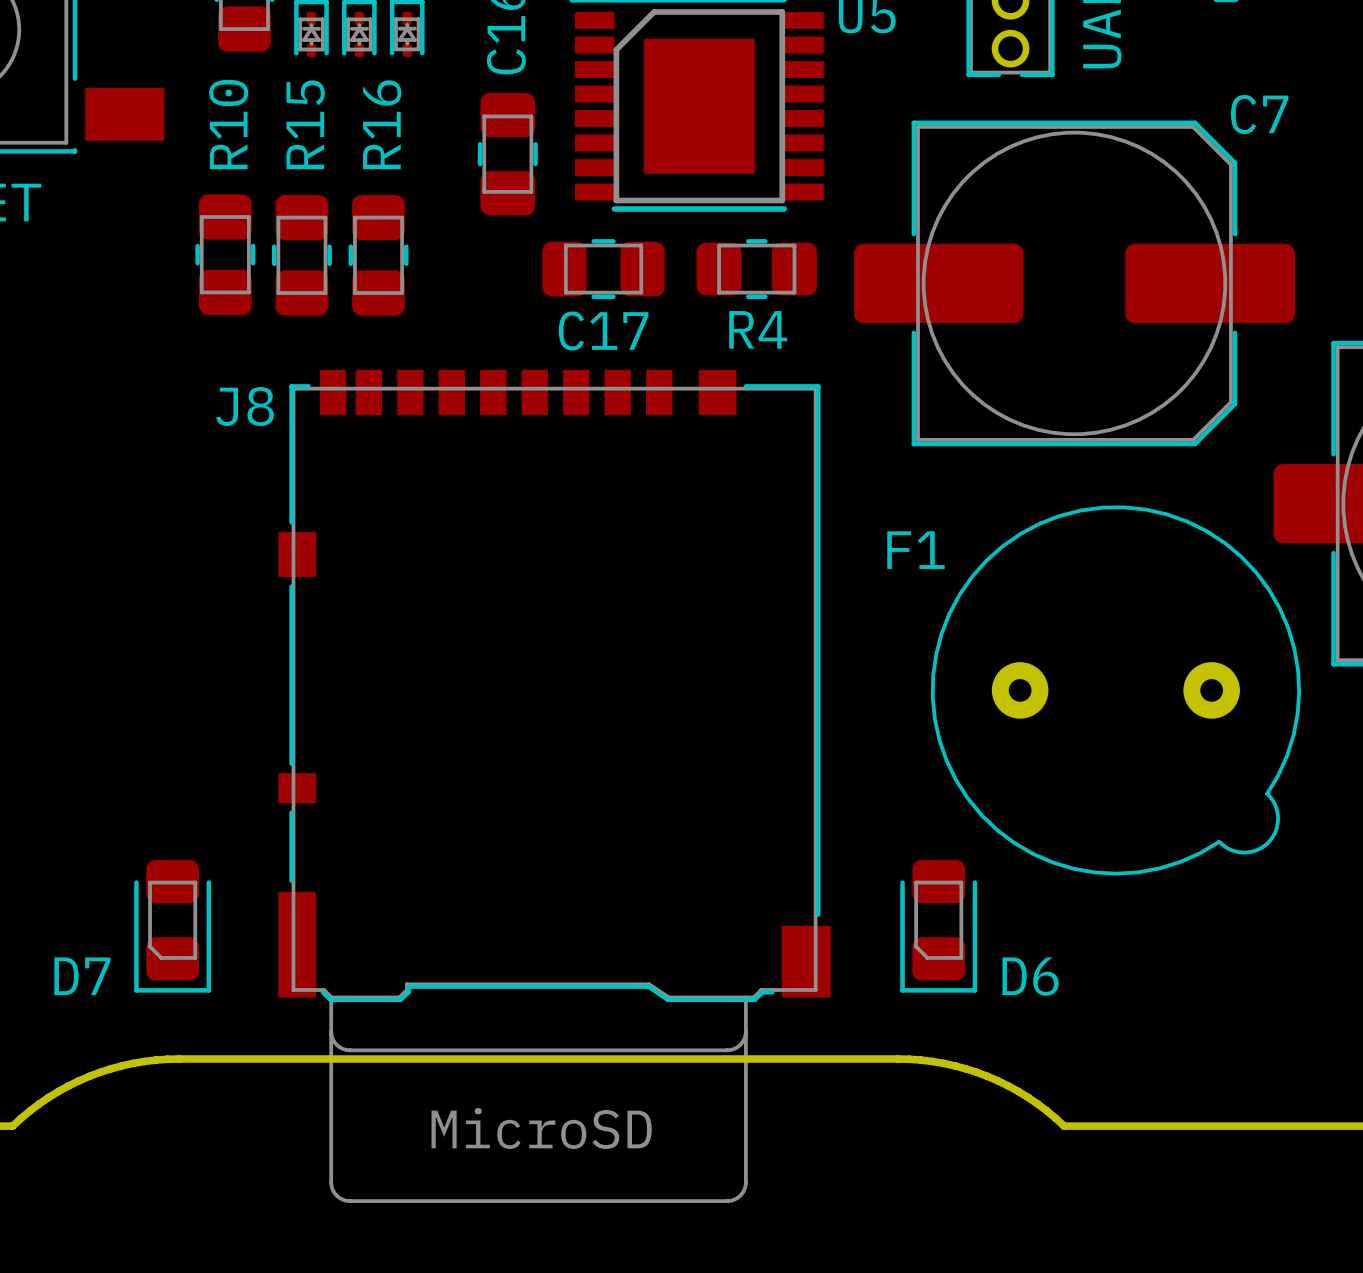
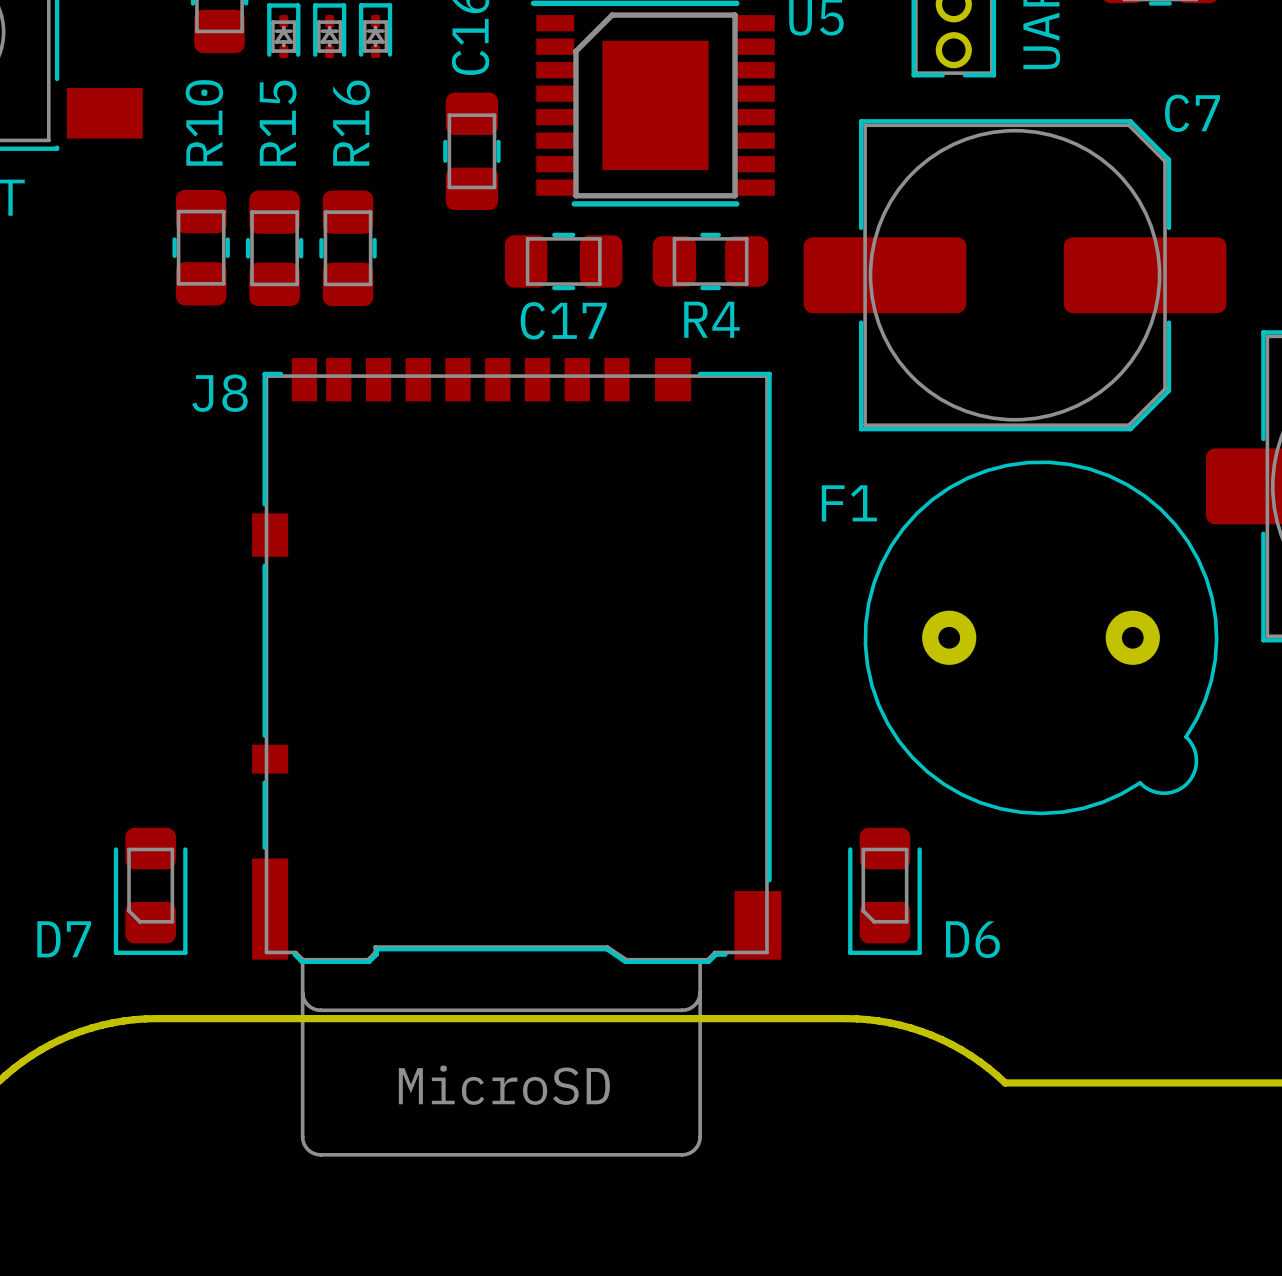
F1 position: (1115, 690) -> (1041, 637)

